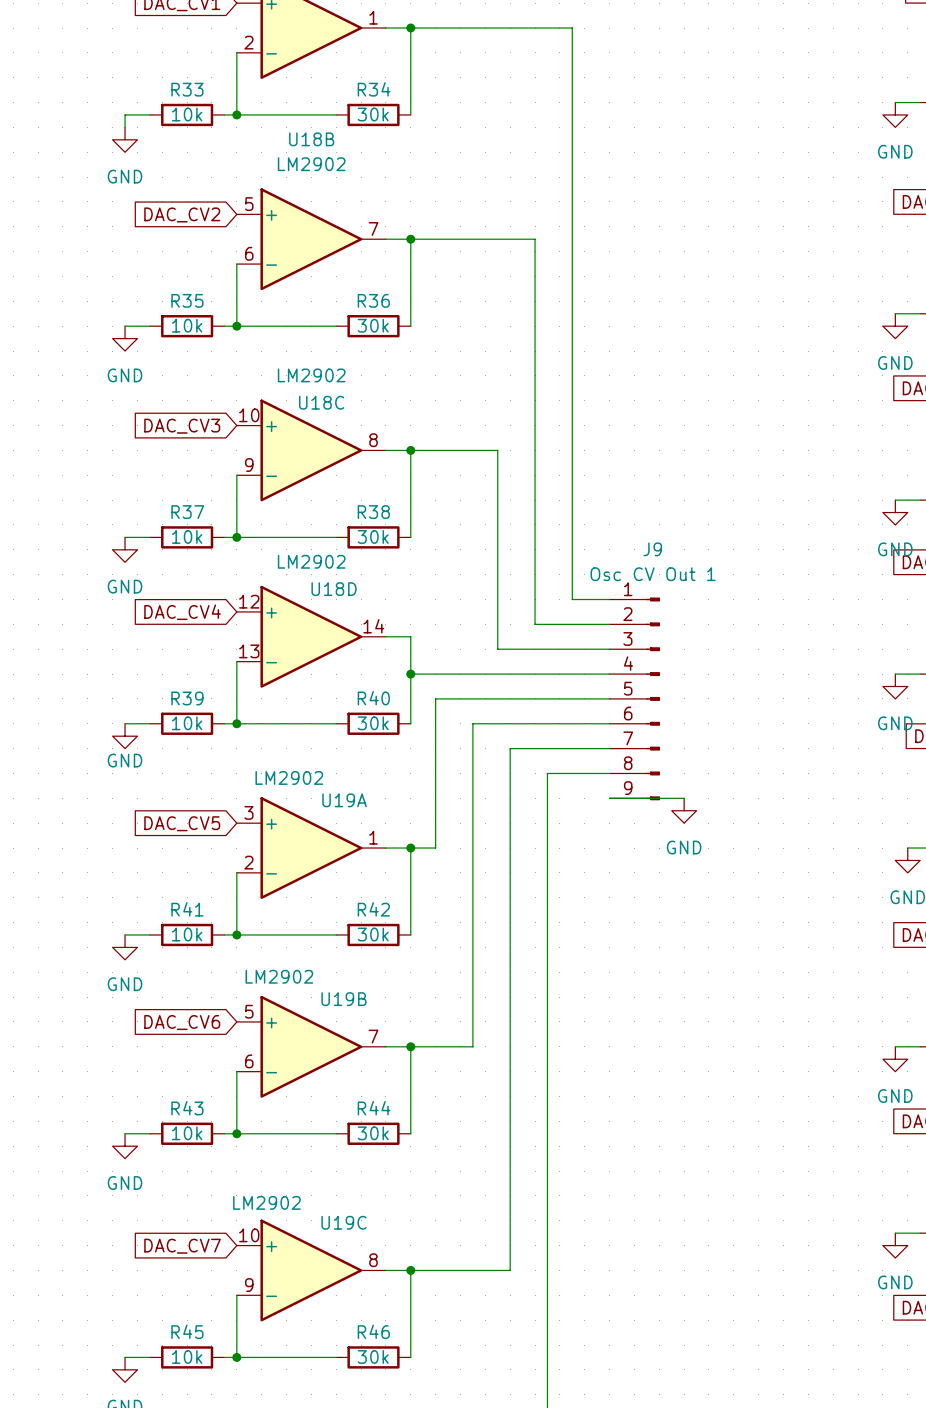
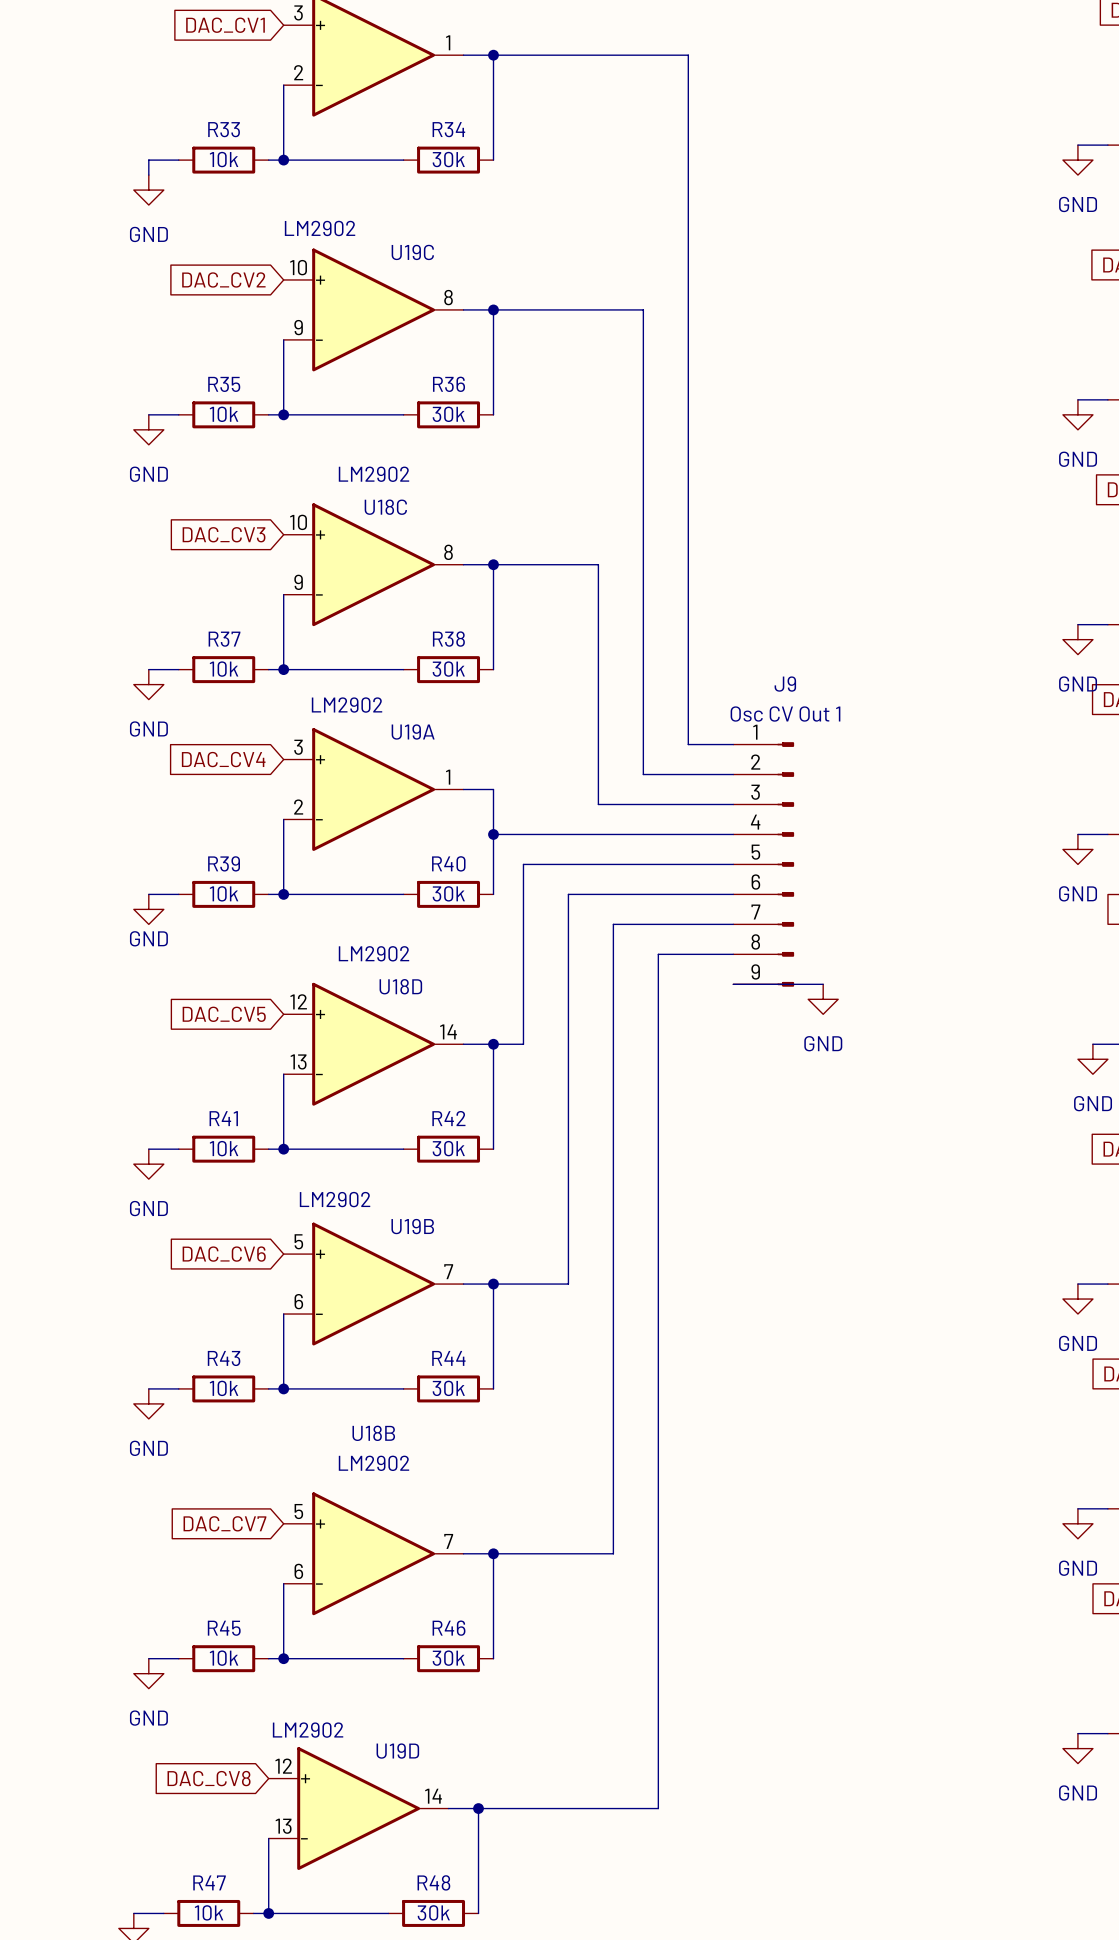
U18B position: (311, 239) -> (373, 1553)
U18D position: (311, 636) -> (373, 1044)
U19A position: (311, 848) -> (373, 789)
U19C position: (311, 1270) -> (373, 309)

